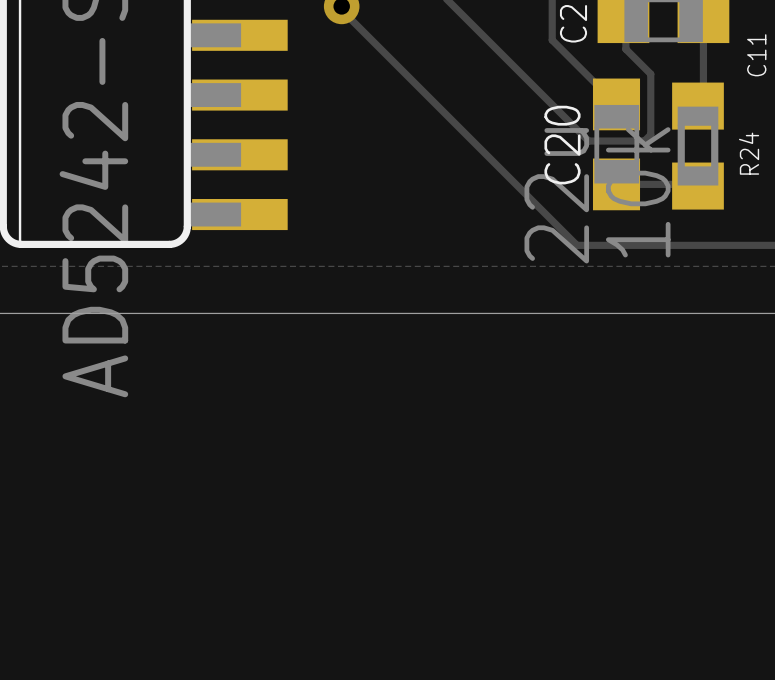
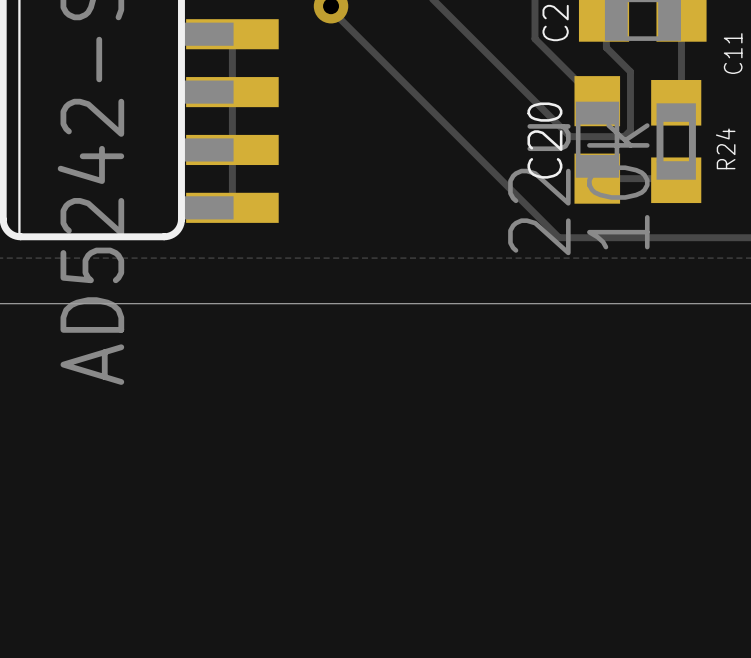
track: none -> (232, 34) (232, 207)

